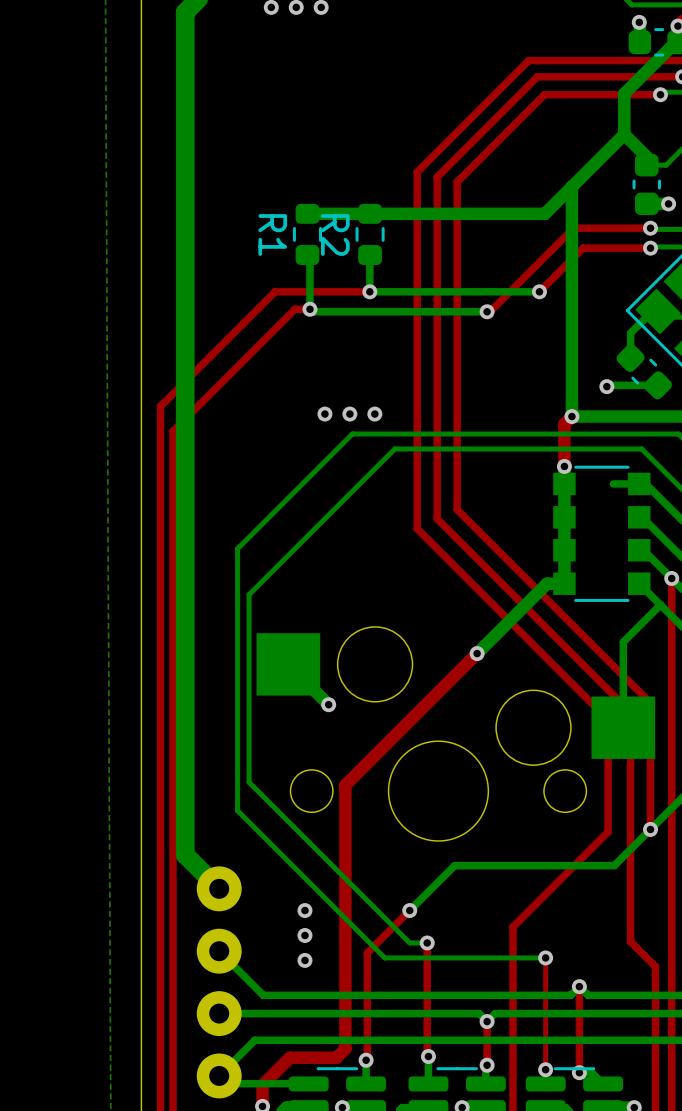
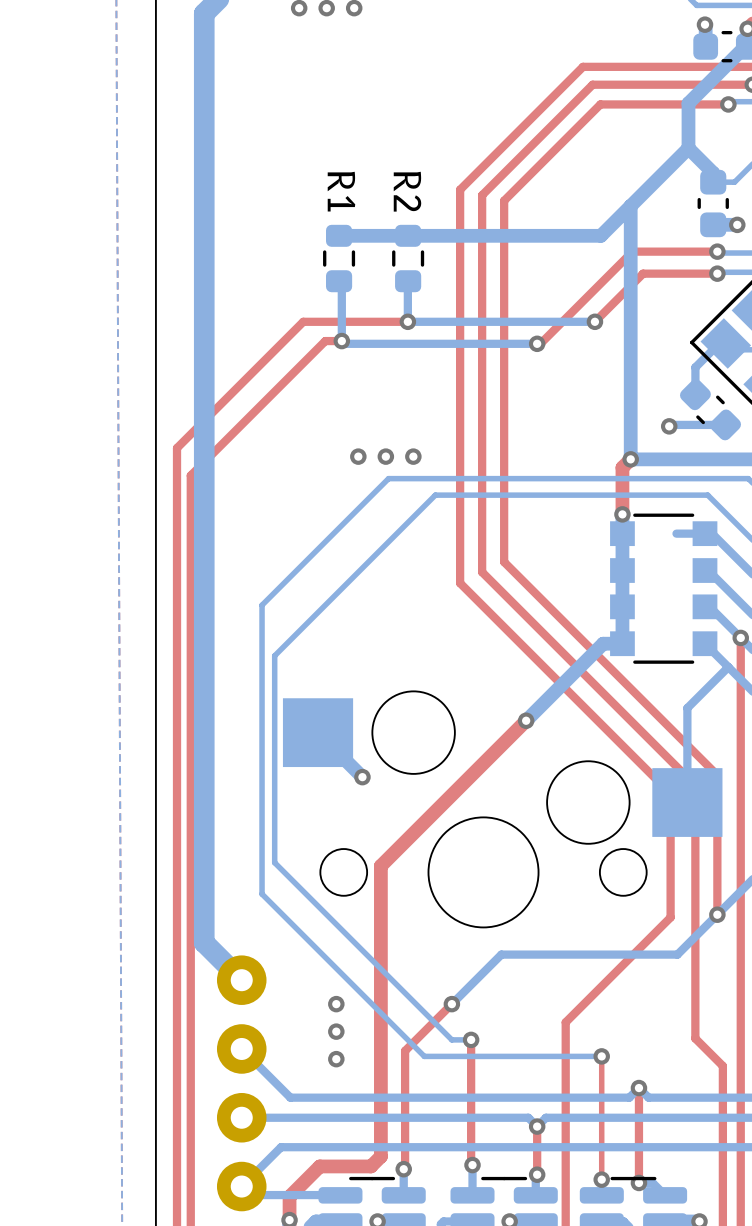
R1 name position: R1 (272, 235) -> R1 (341, 191)
R2 name position: R2 (335, 235) -> R2 (407, 191)

